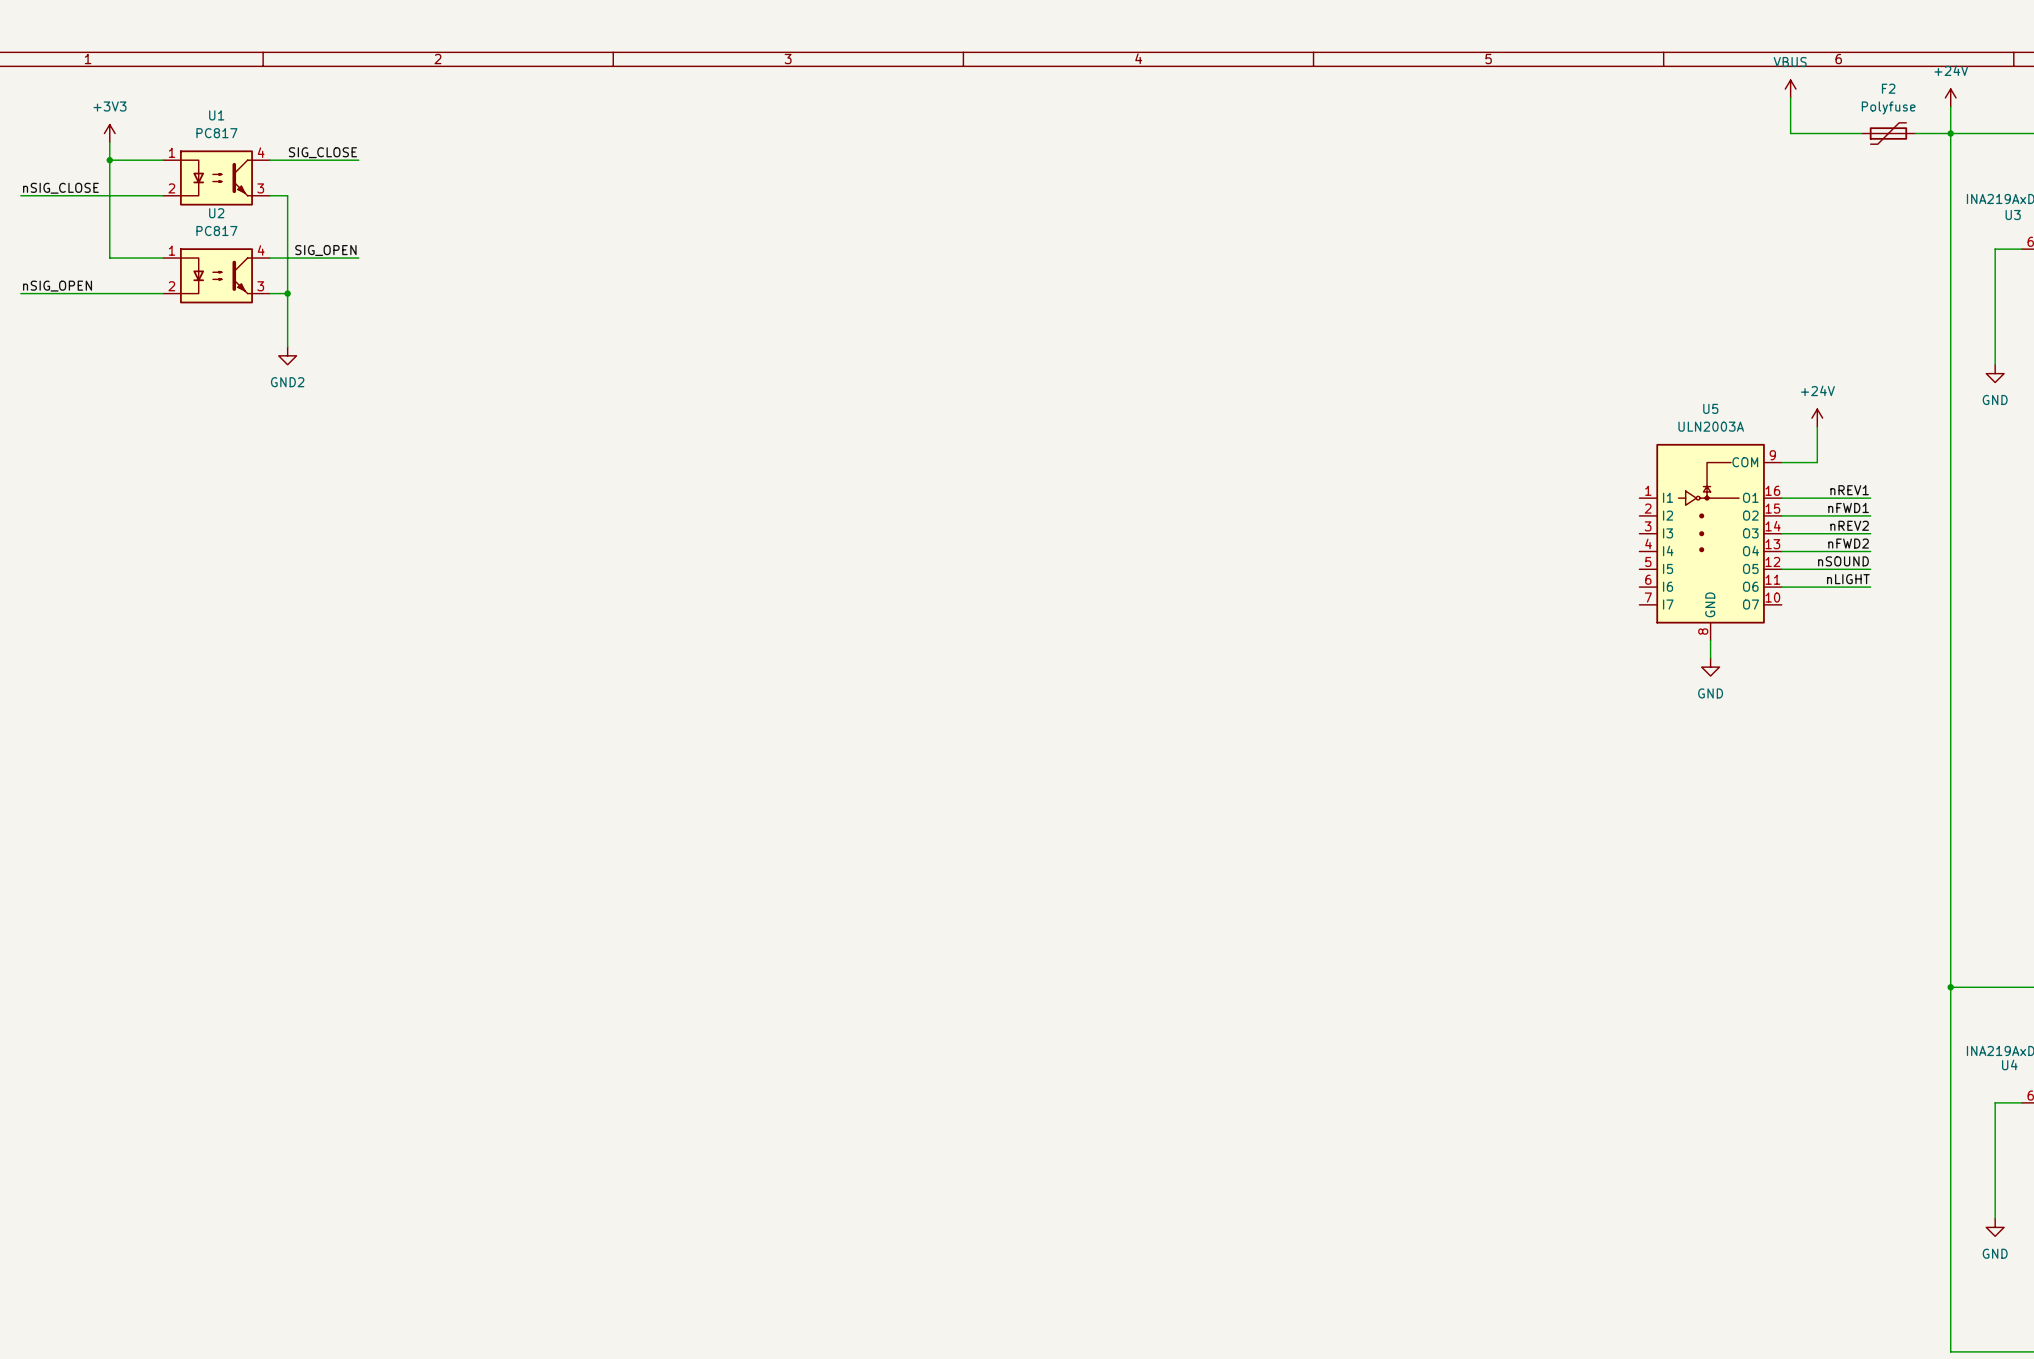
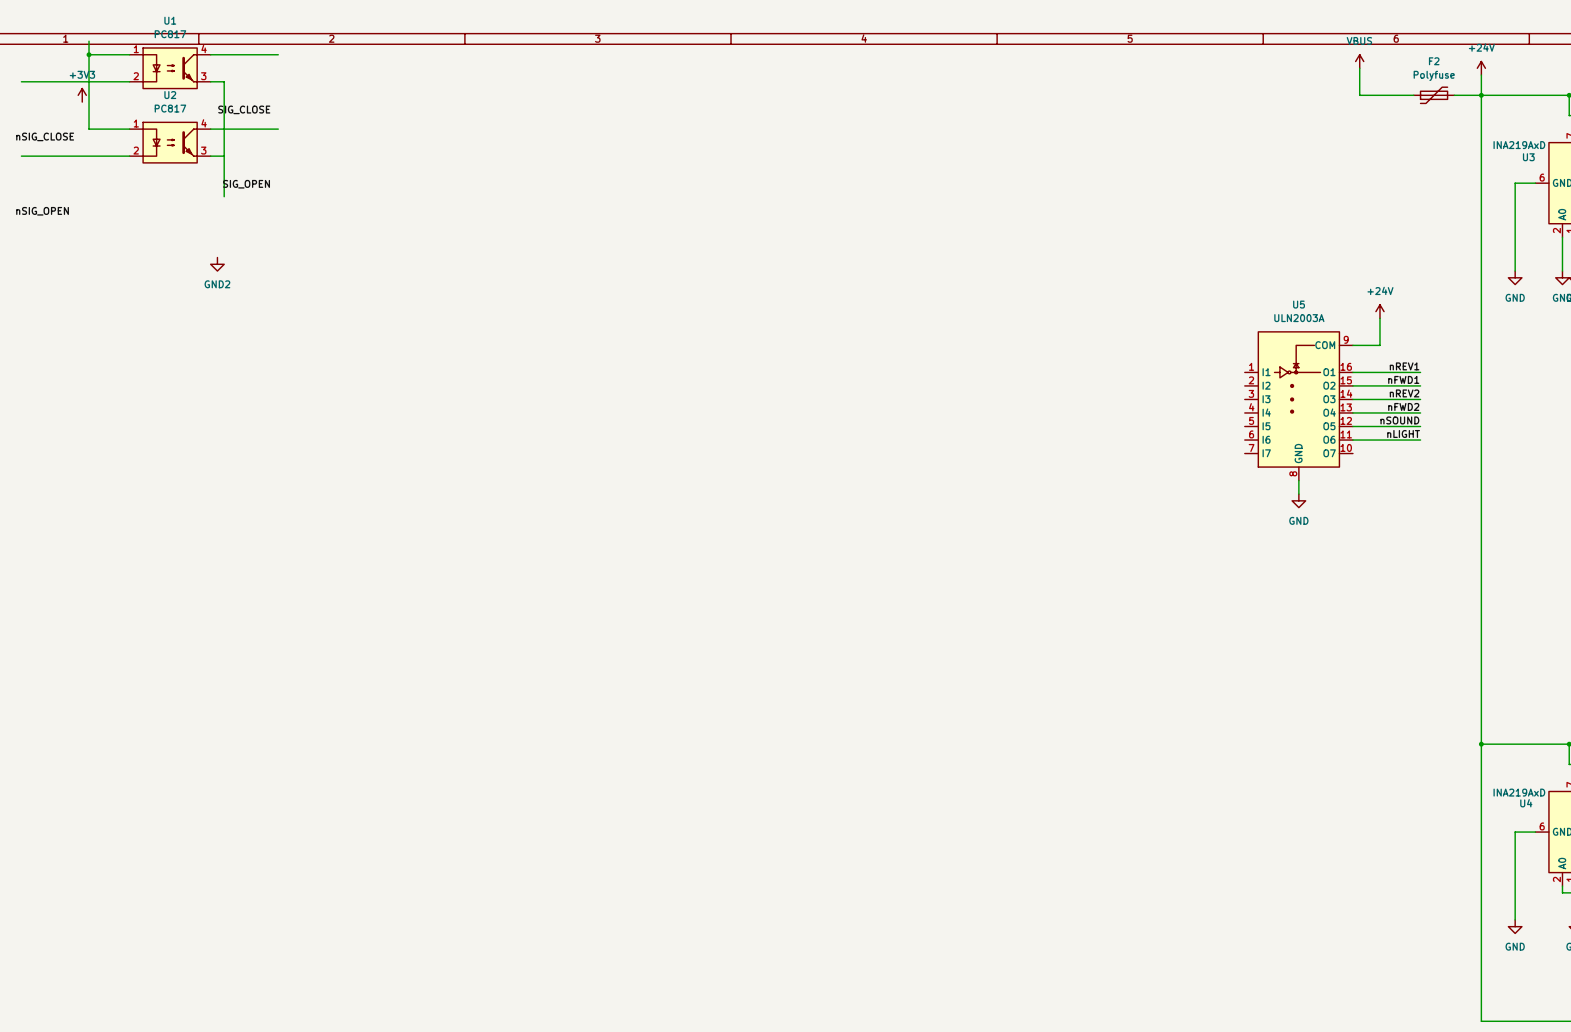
junction: none -> (89, 54)
wire: (109, 142) (109, 258) (163, 258) -> (89, 41) (89, 129) (129, 129)
wire: (109, 160) (163, 160) -> (89, 54) (129, 54)
junction: (109, 160) -> none
wire: (269, 160) (358, 160) -> (210, 54) (278, 54)
U1 position: (216, 177) -> (170, 68)
wire: (20, 195) (163, 195) -> (21, 81) (129, 81)
wire: (269, 195) (287, 195) (287, 346) -> (210, 81) (224, 81) (224, 196)
wire: (269, 258) (358, 258) -> (210, 129) (278, 129)
U2 position: (216, 275) -> (170, 142)
wire: (20, 293) (163, 293) -> (21, 156) (129, 156)
wire: (269, 293) (287, 293) -> (210, 156) (224, 156)
junction: (287, 293) -> none

